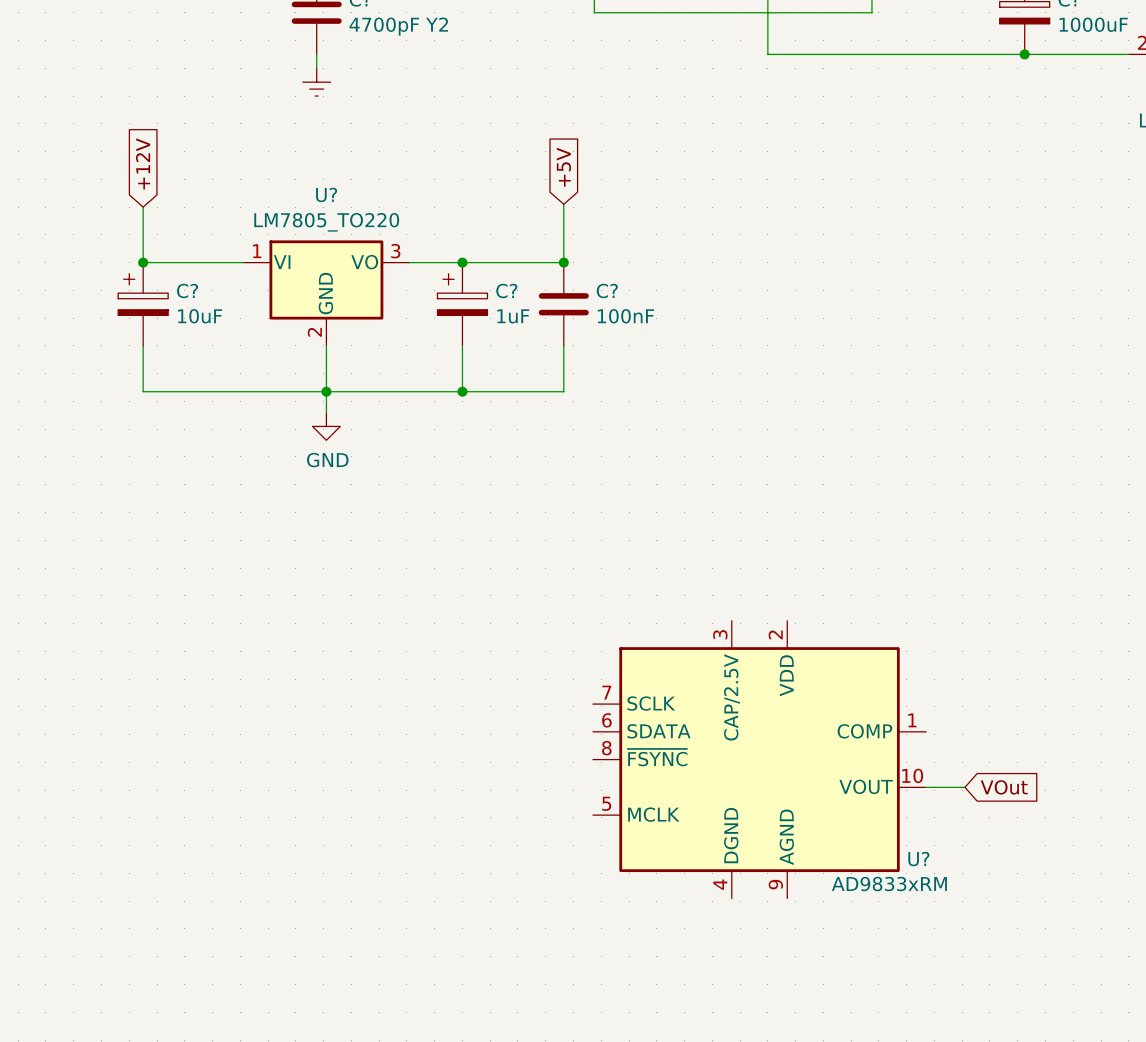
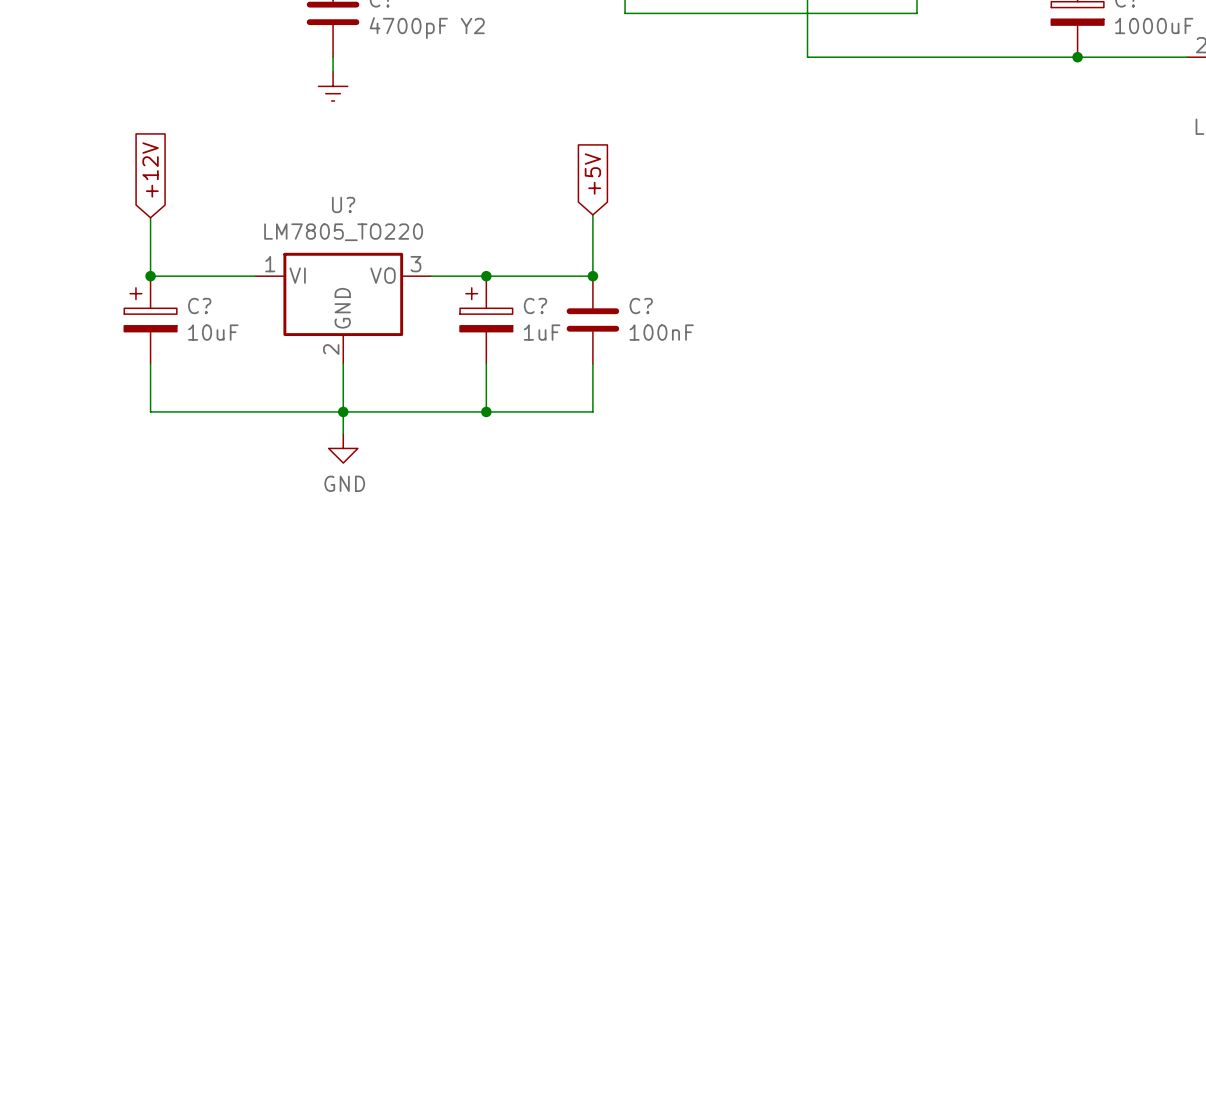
U?: AD9833xRM (759, 759) -> none
wire: (926, 787) (964, 787) -> none
global label: VOut (1004, 787) -> none

